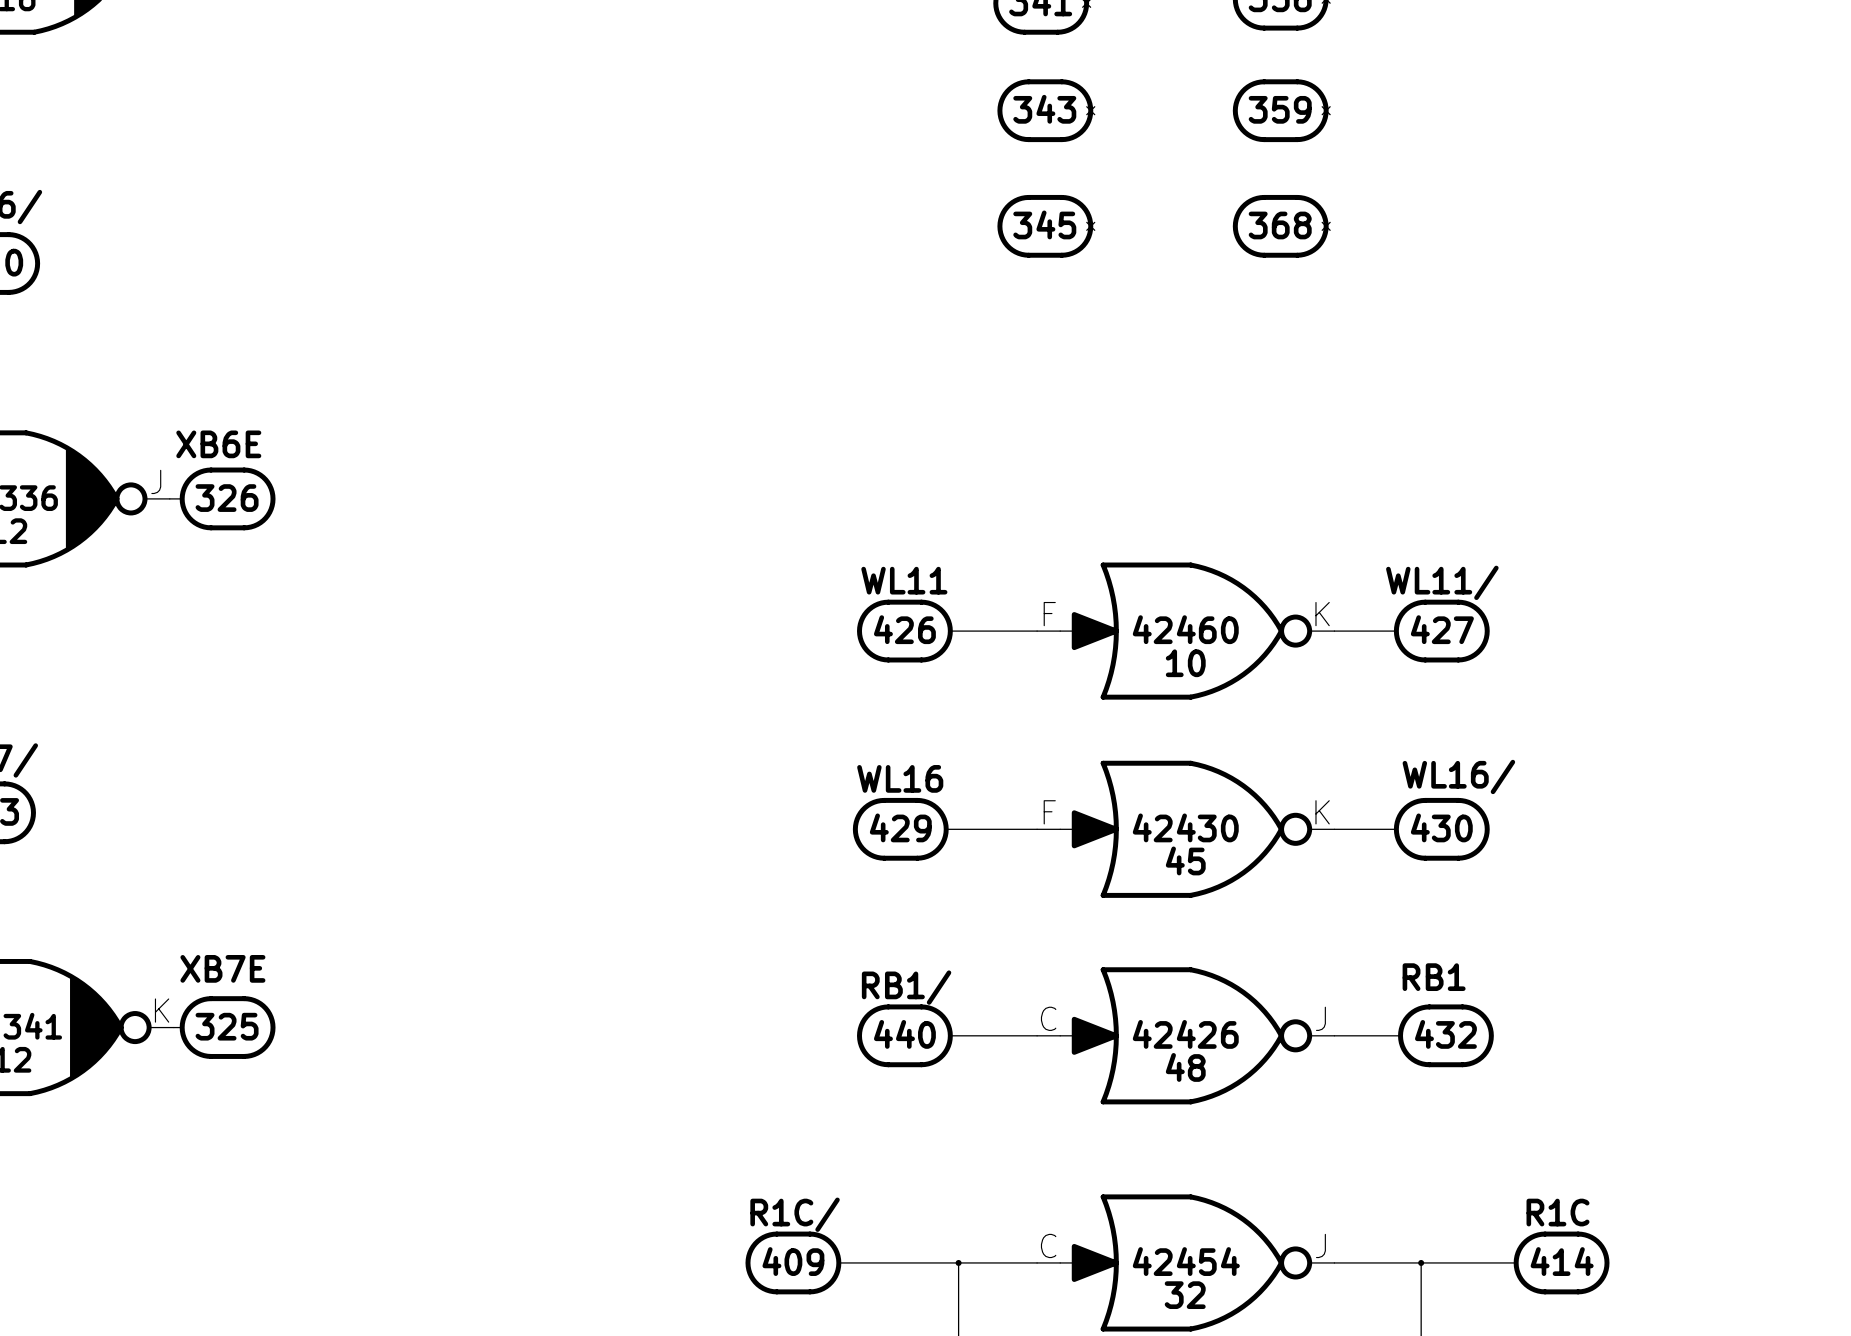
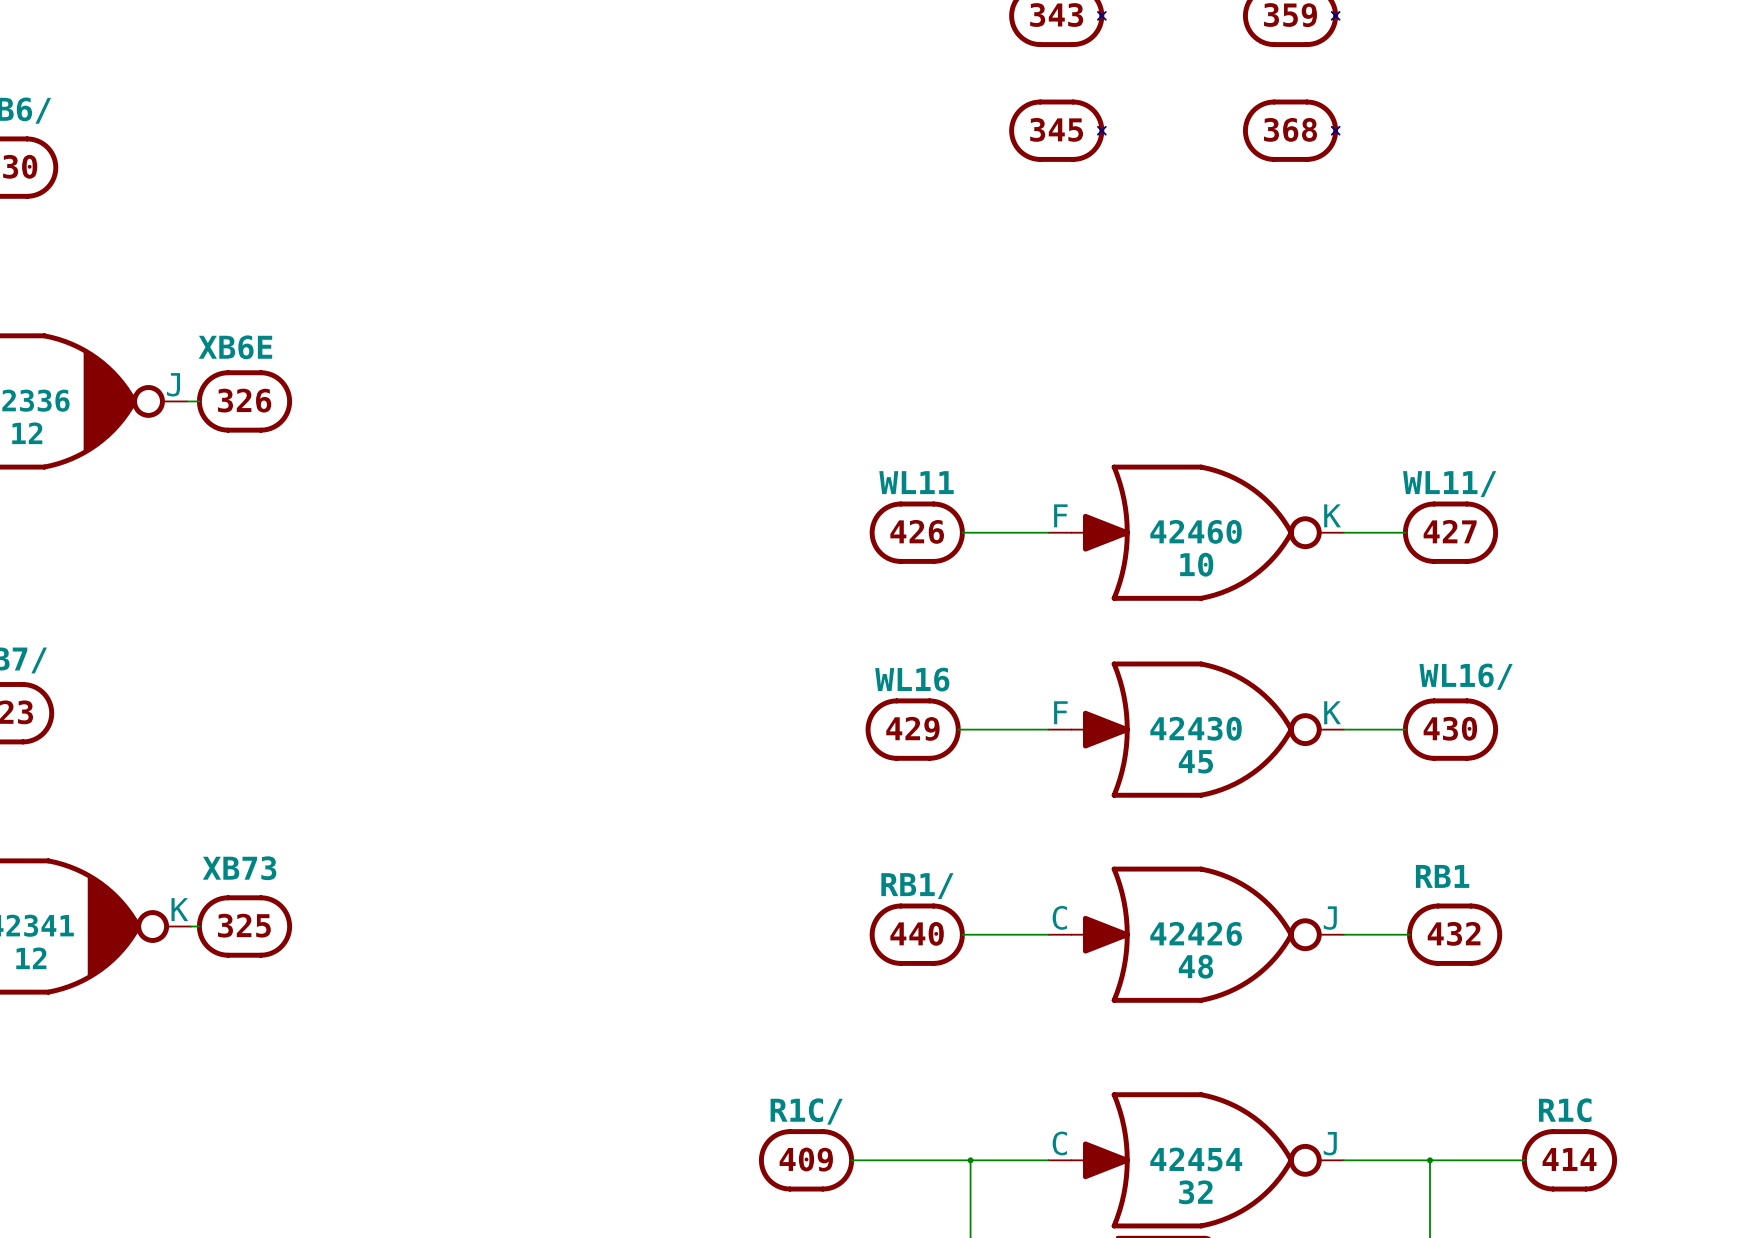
part text: XB7E (222, 968) -> XB73 (239, 868)

